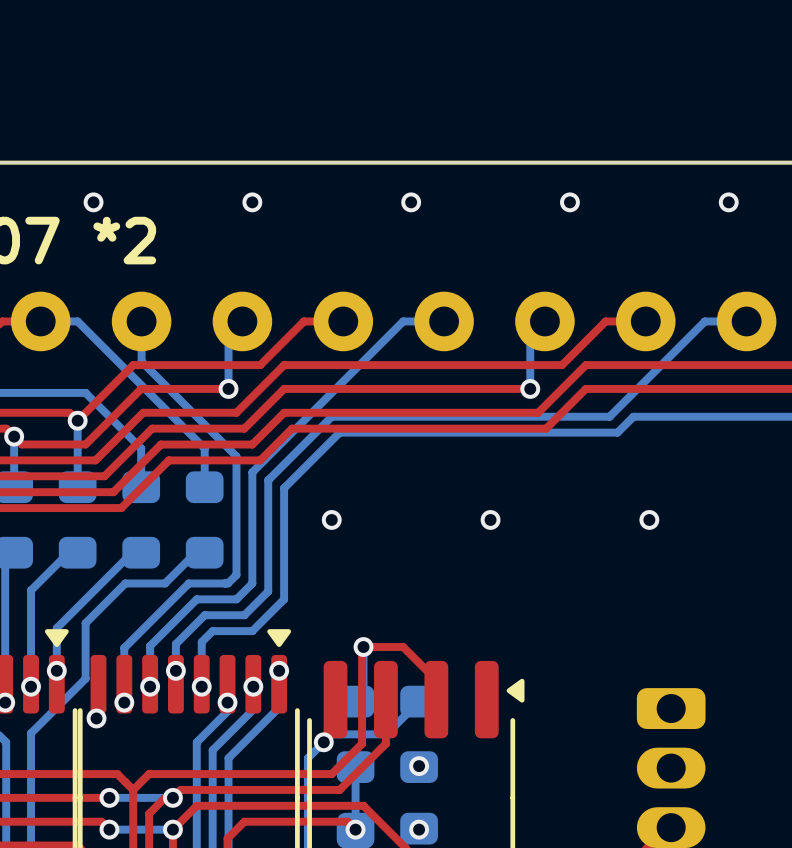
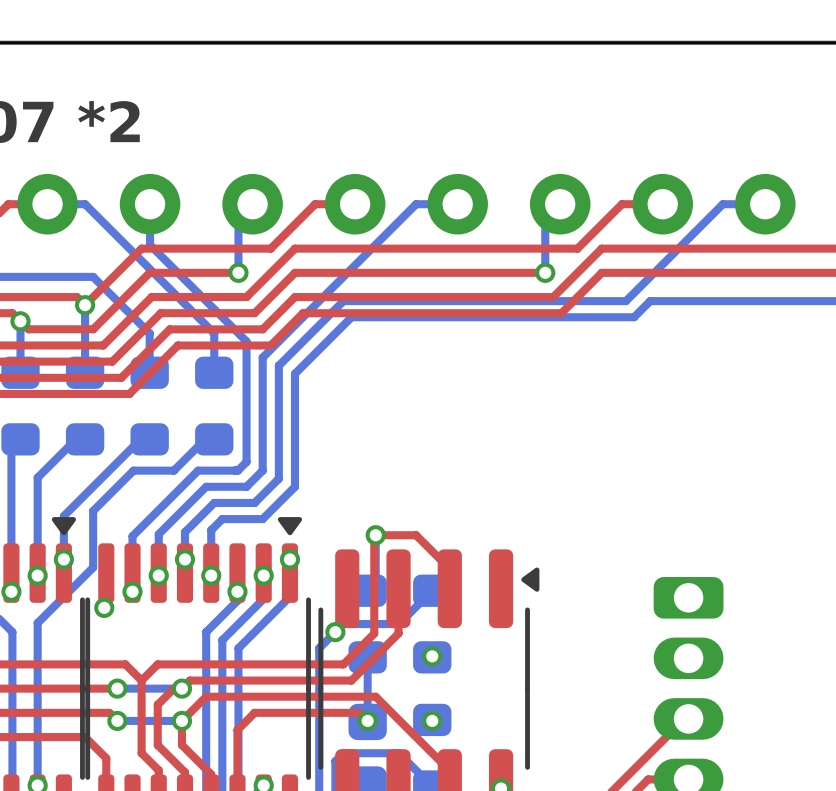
via: (93, 202) -> none
via: (252, 202) -> none
via: (411, 202) -> none
via: (569, 202) -> none
via: (728, 202) -> none
via: (331, 519) -> none
via: (490, 519) -> none
via: (649, 519) -> none

